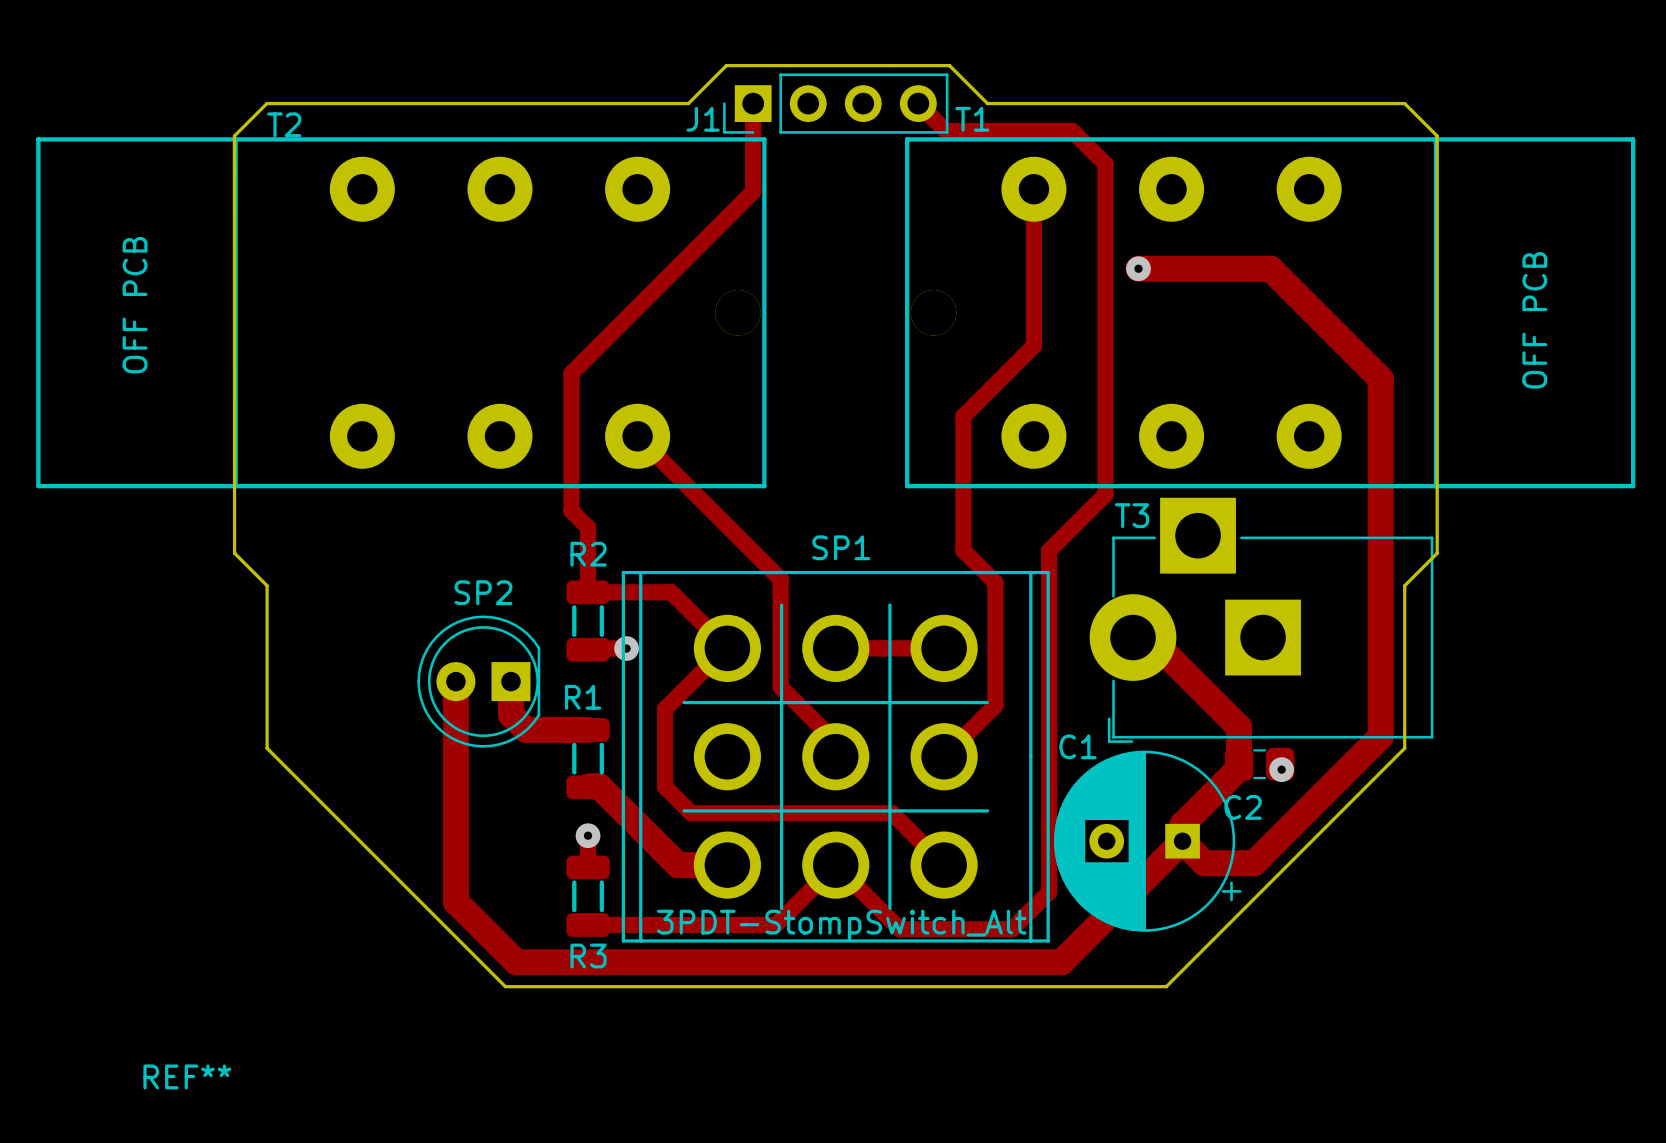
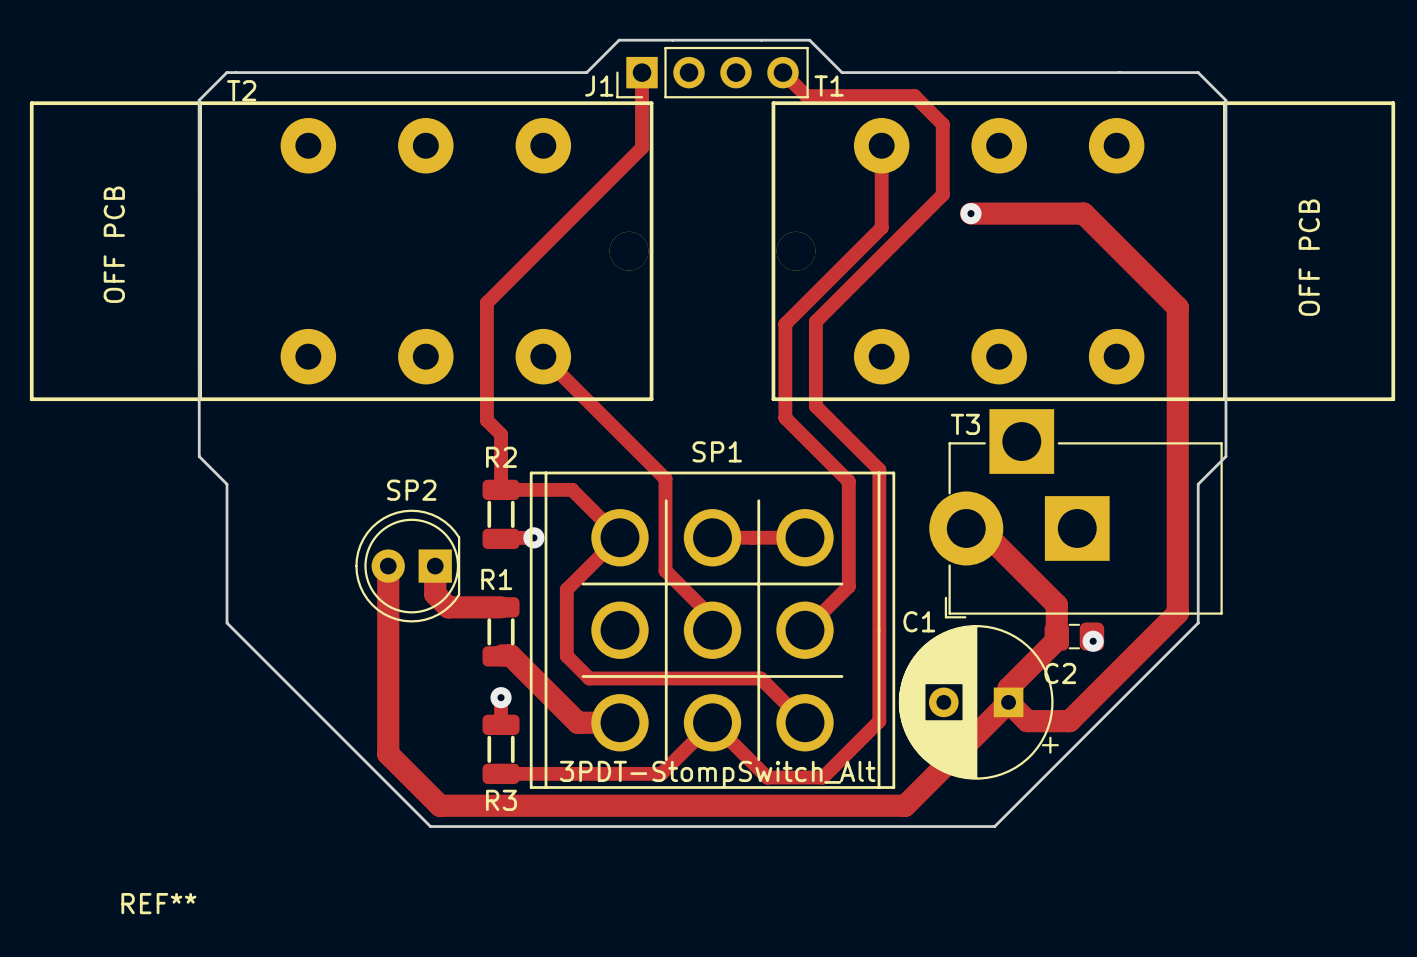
track: (1105, 246) (1105, 494) (1049, 550) (1049, 892) (1011, 929) (965, 929) -> (942, 194) (815, 321) (815, 406) (879, 469) (879, 721) (822, 777)
track: (1033, 285) (1033, 345) (963, 416) (963, 550) -> (881, 227) (785, 324) (785, 418) (821, 454)

